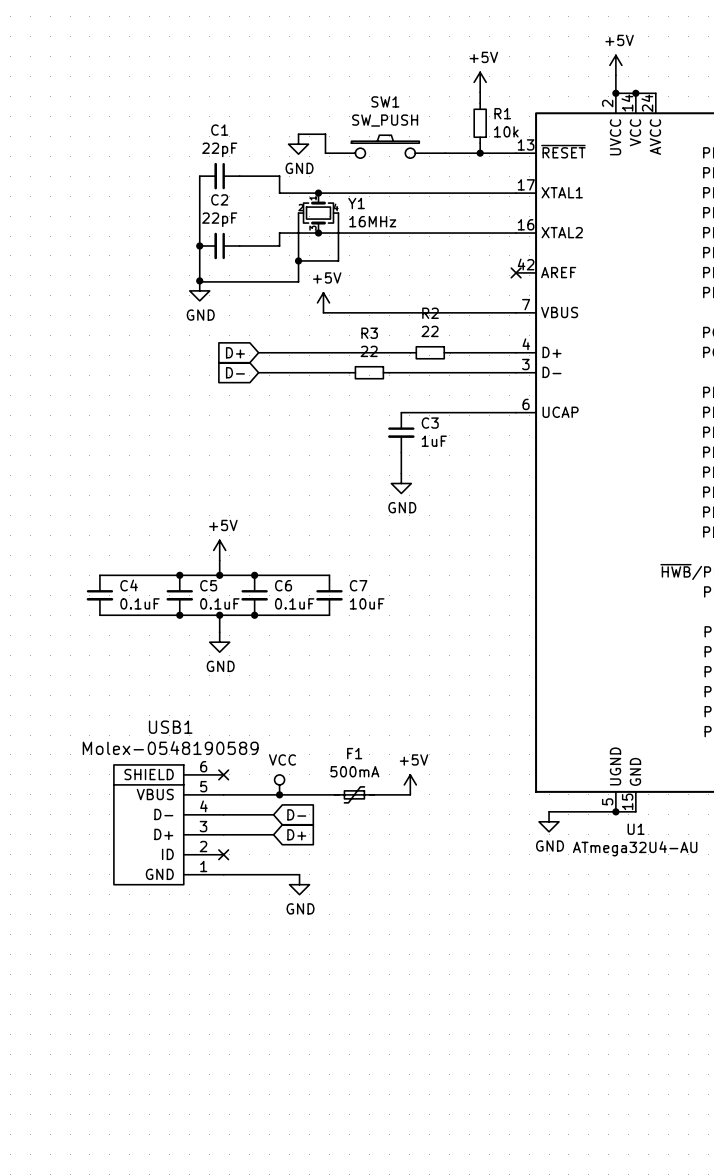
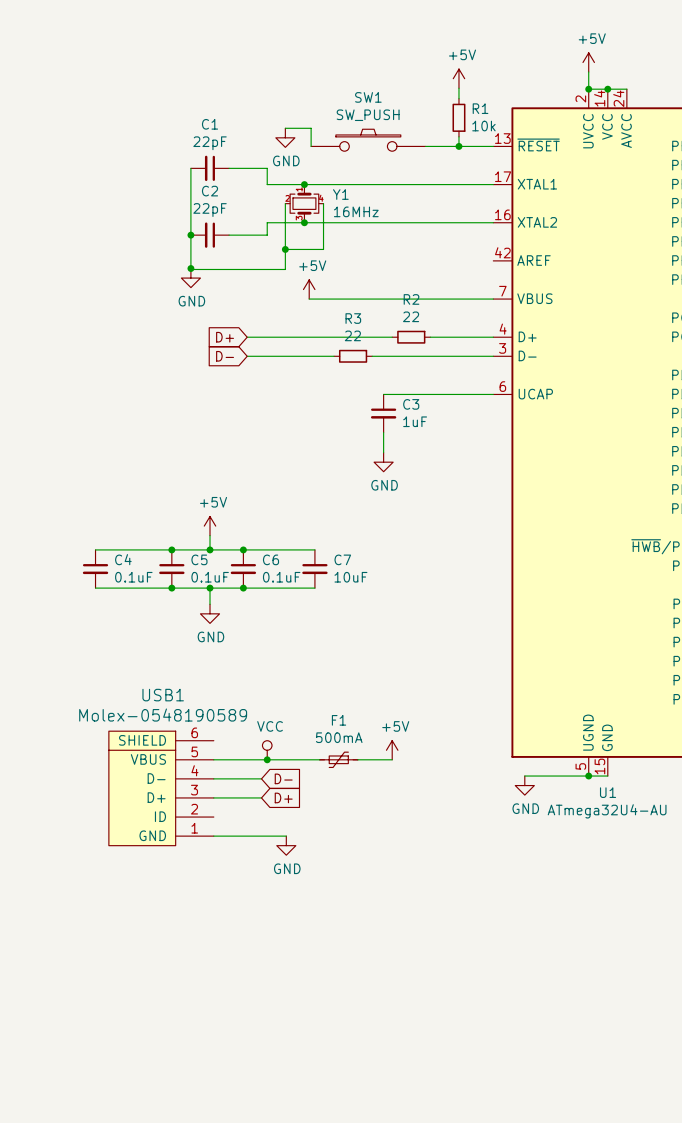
no-connect mark: (516, 272) -> none
no-connect mark: (223, 774) -> none
no-connect mark: (223, 854) -> none

